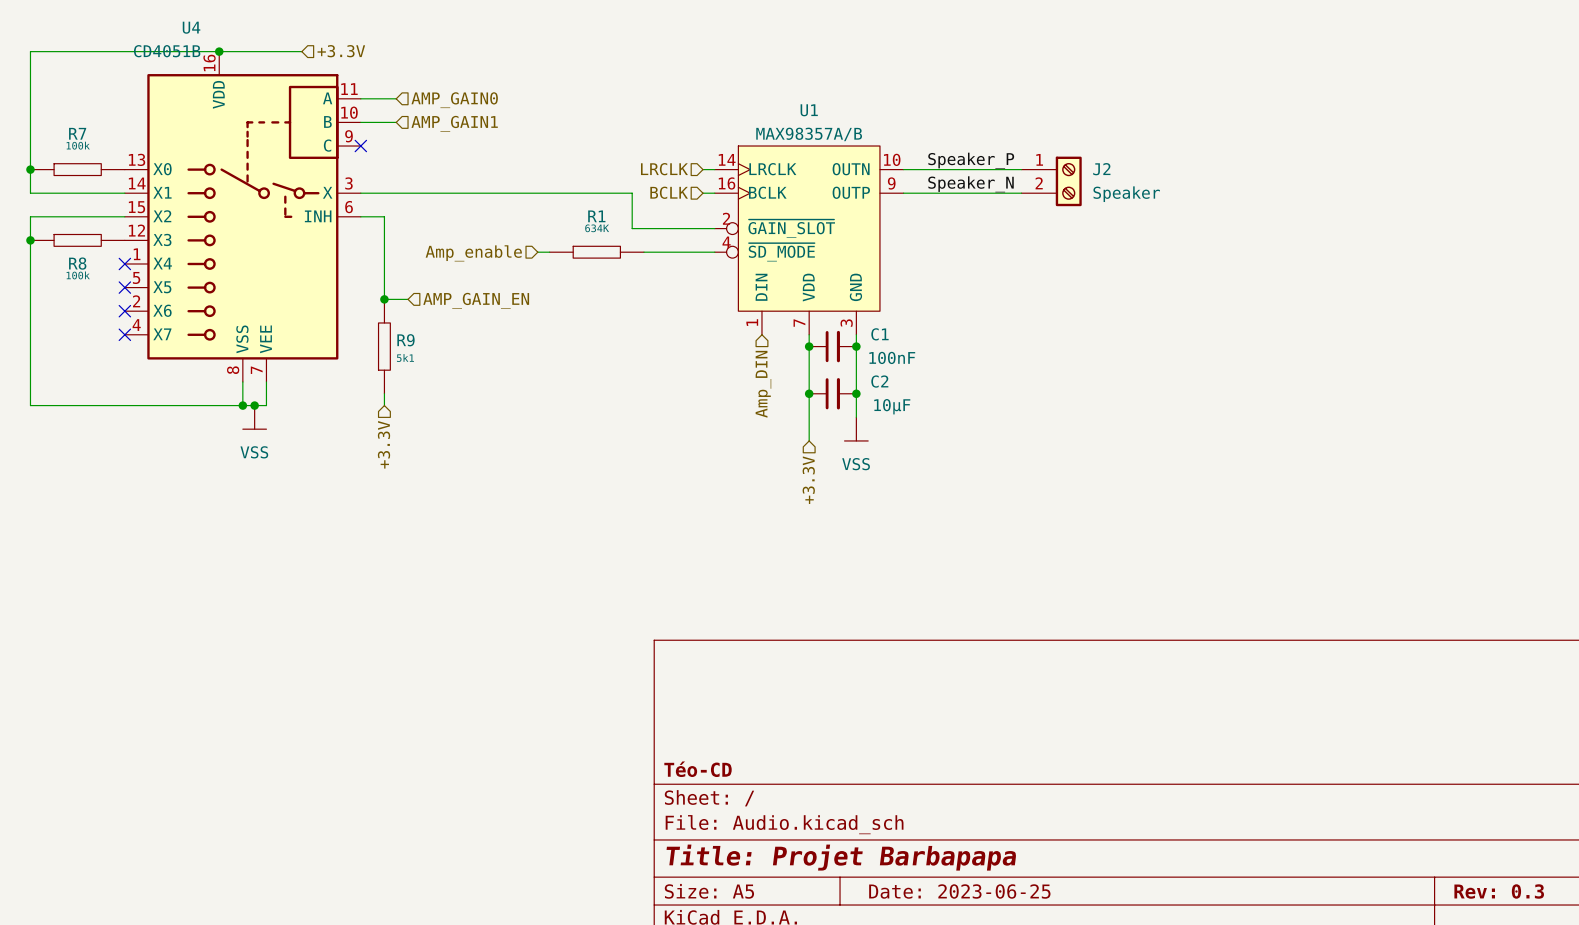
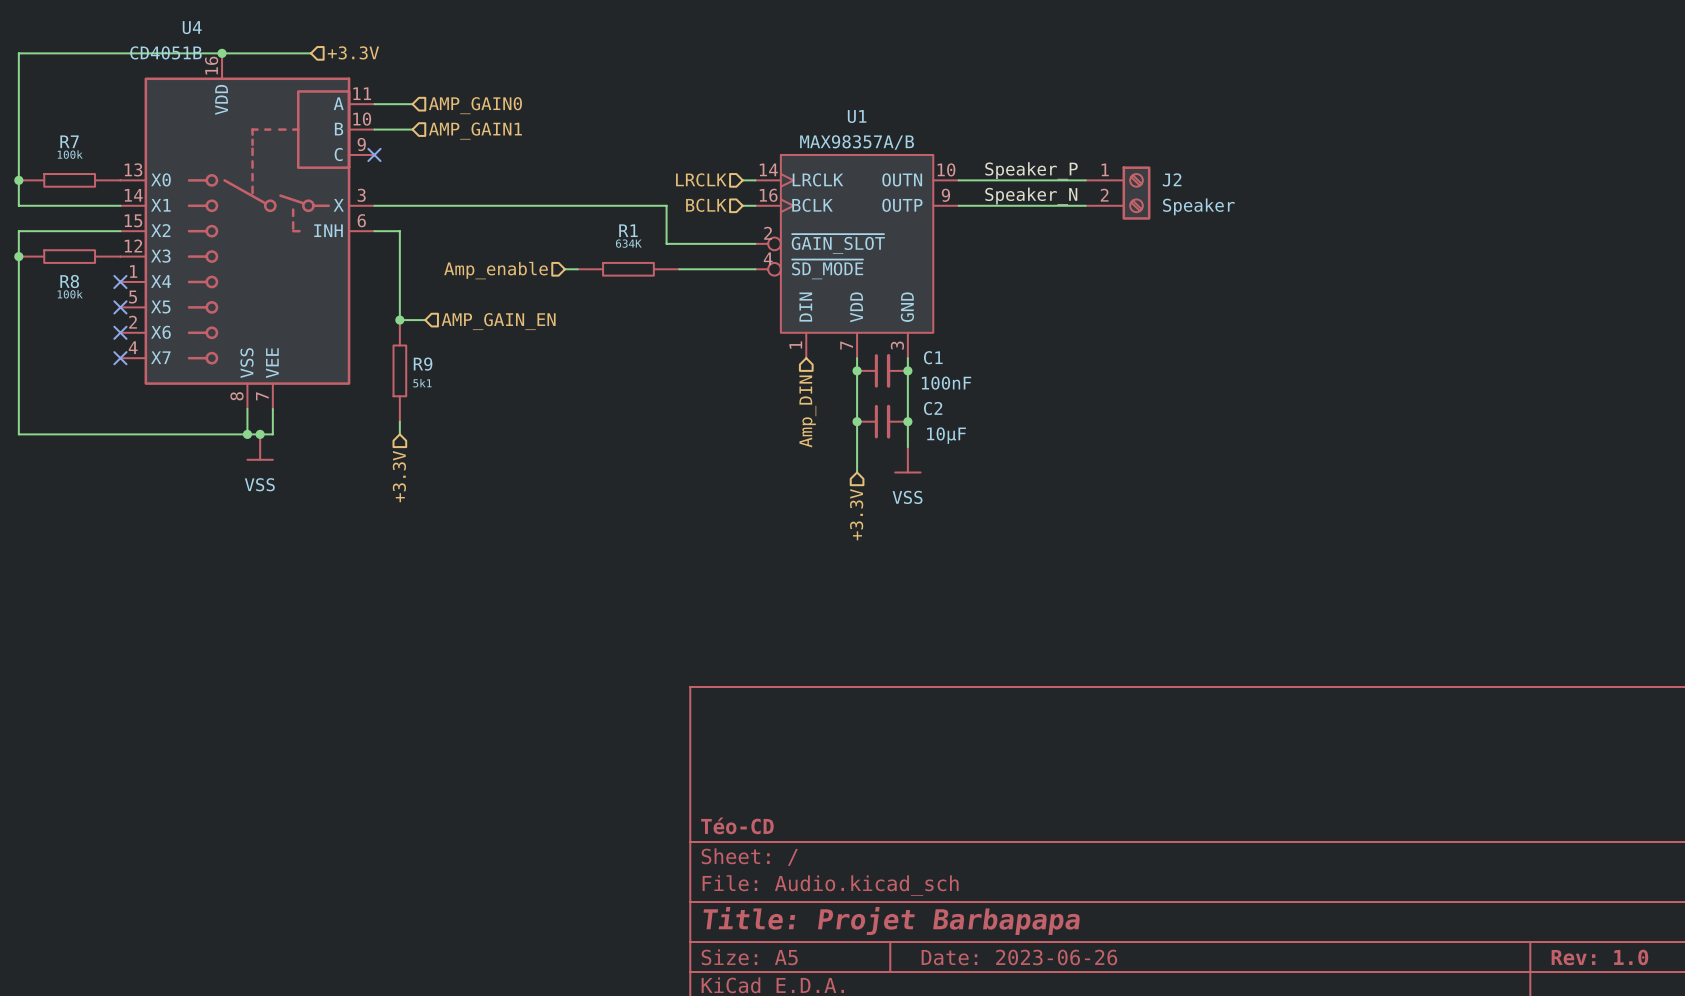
title block: Date: 2023-06-25 (959, 891) -> Date: 2023-06-26 (1019, 957)
title block: Rev: 0.3 (1499, 891) -> Rev: 1.0 (1599, 957)

